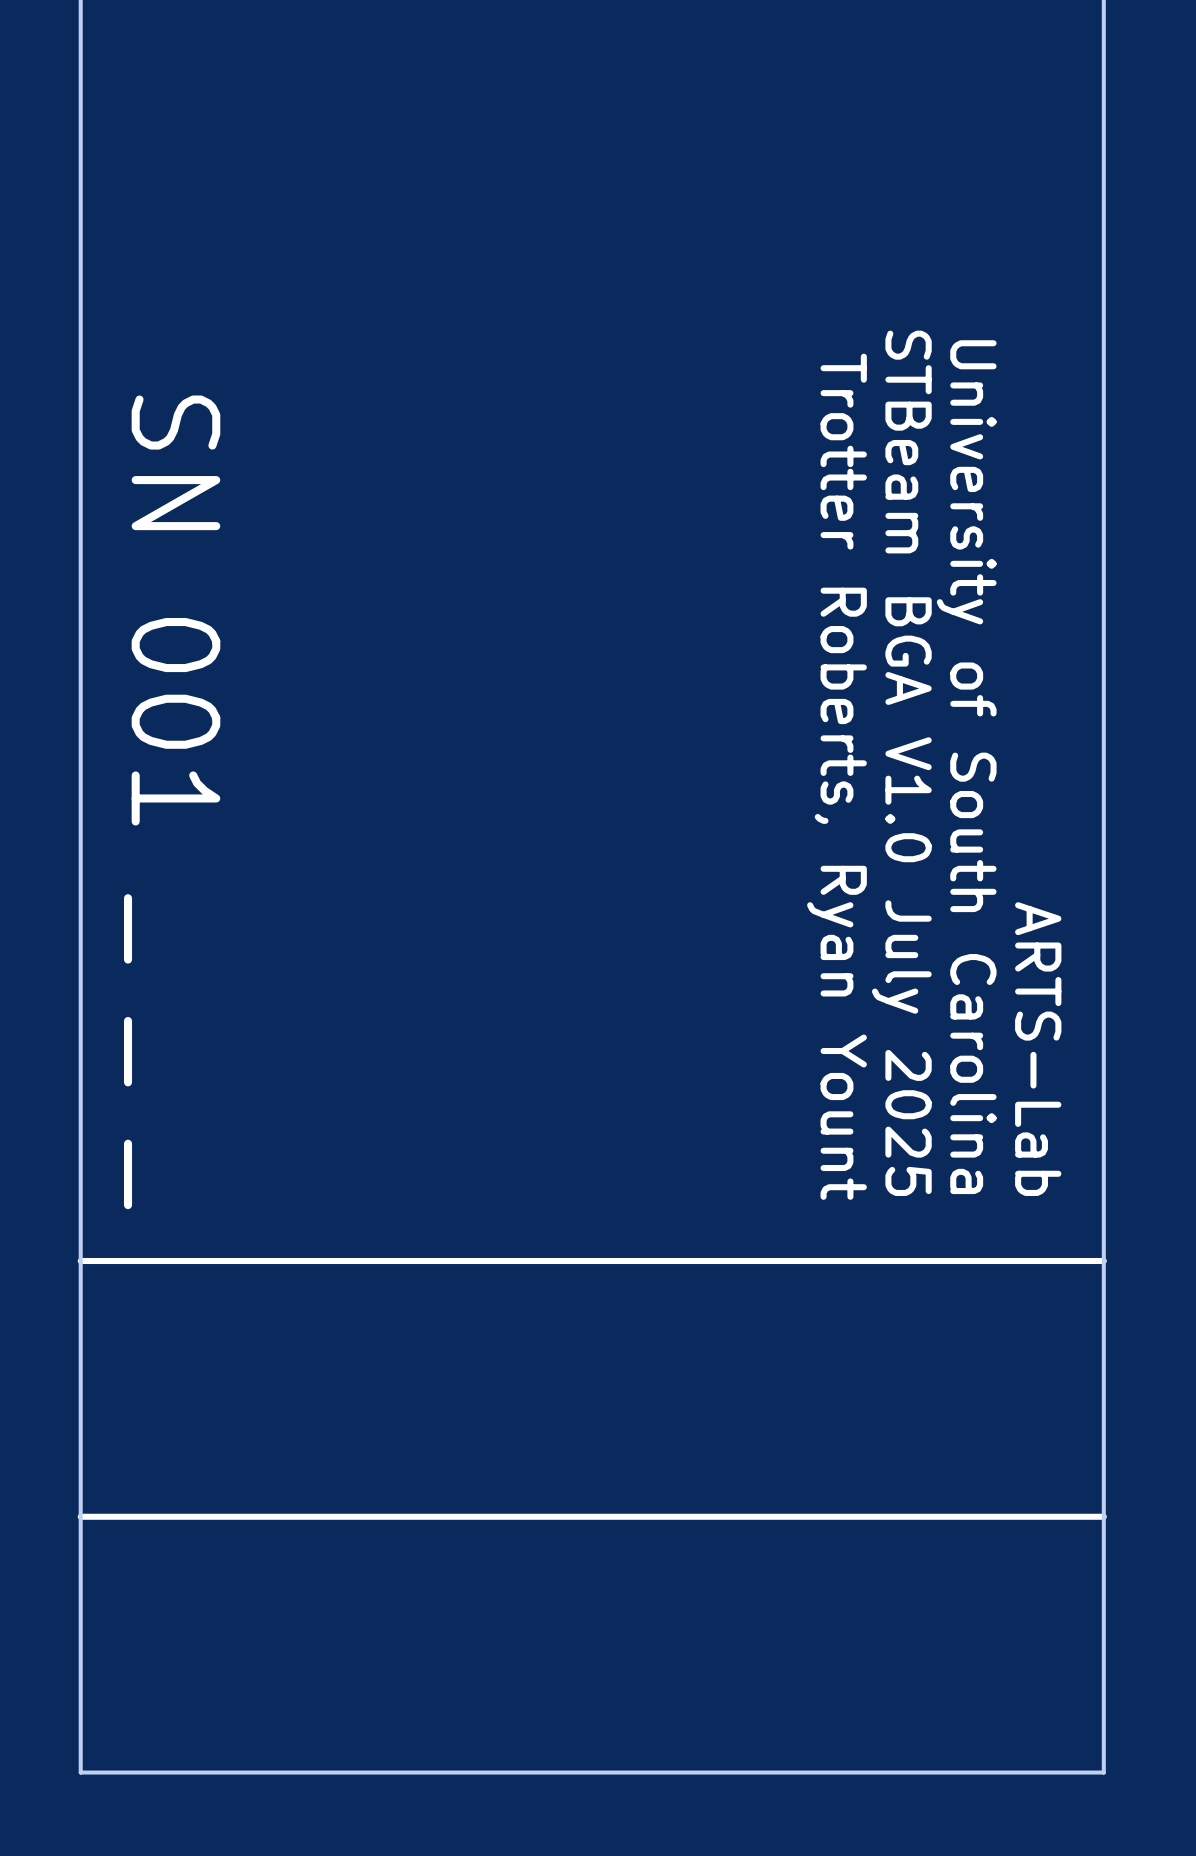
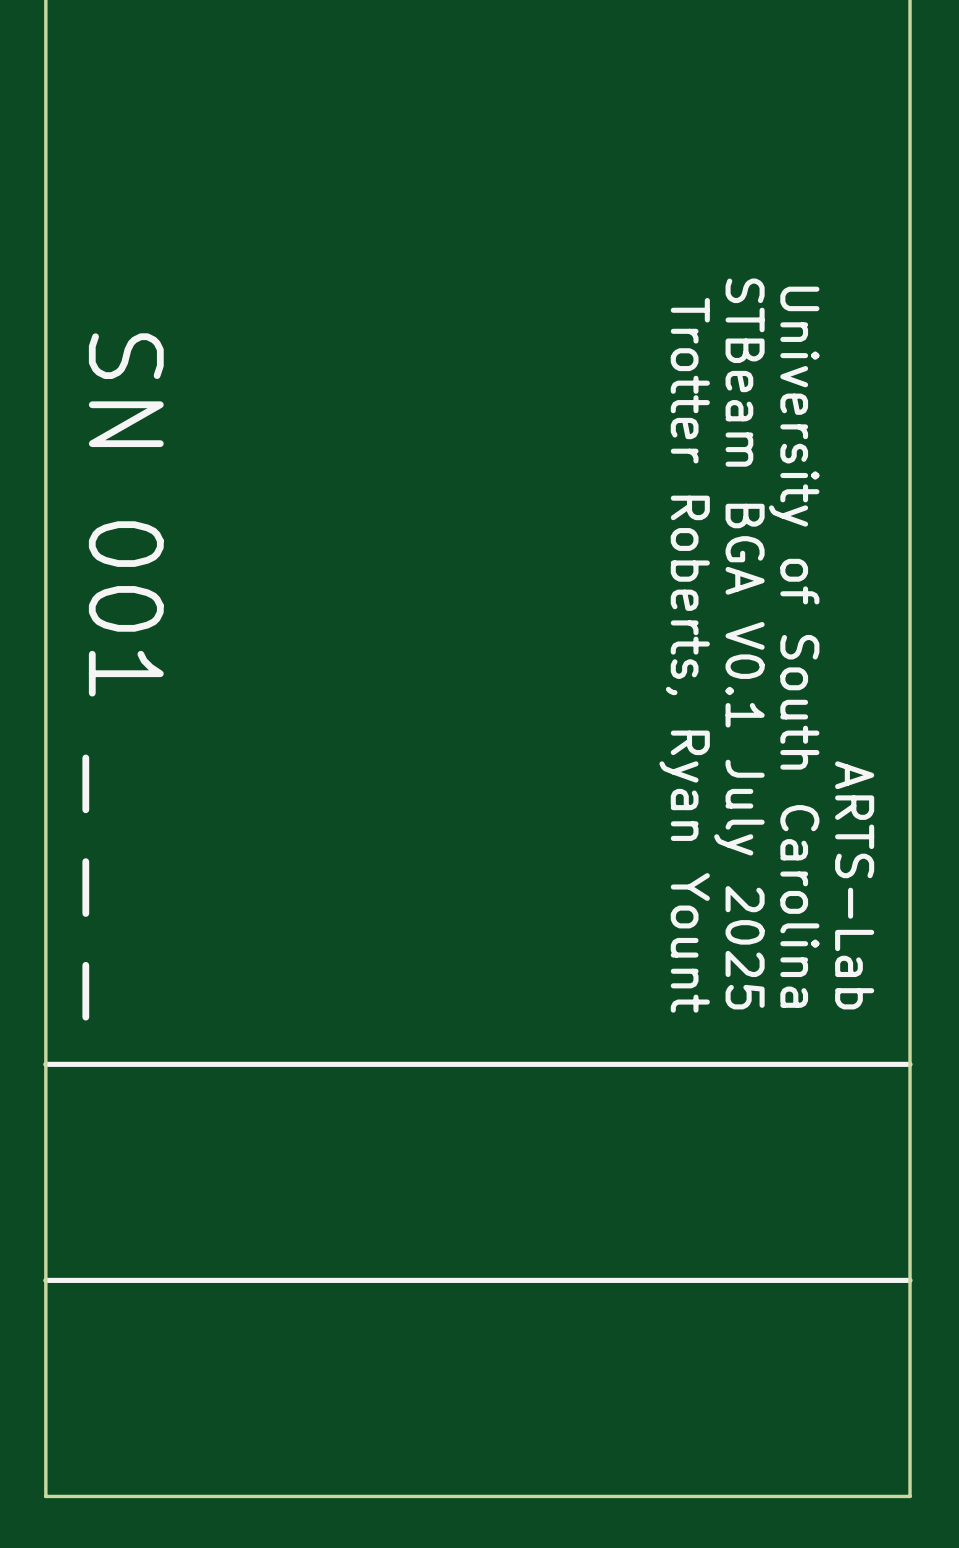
text: STBeam BGA V1.0 July 2025 (901, 763) -> STBeam BGA V0.1 July 2025 (739, 643)

